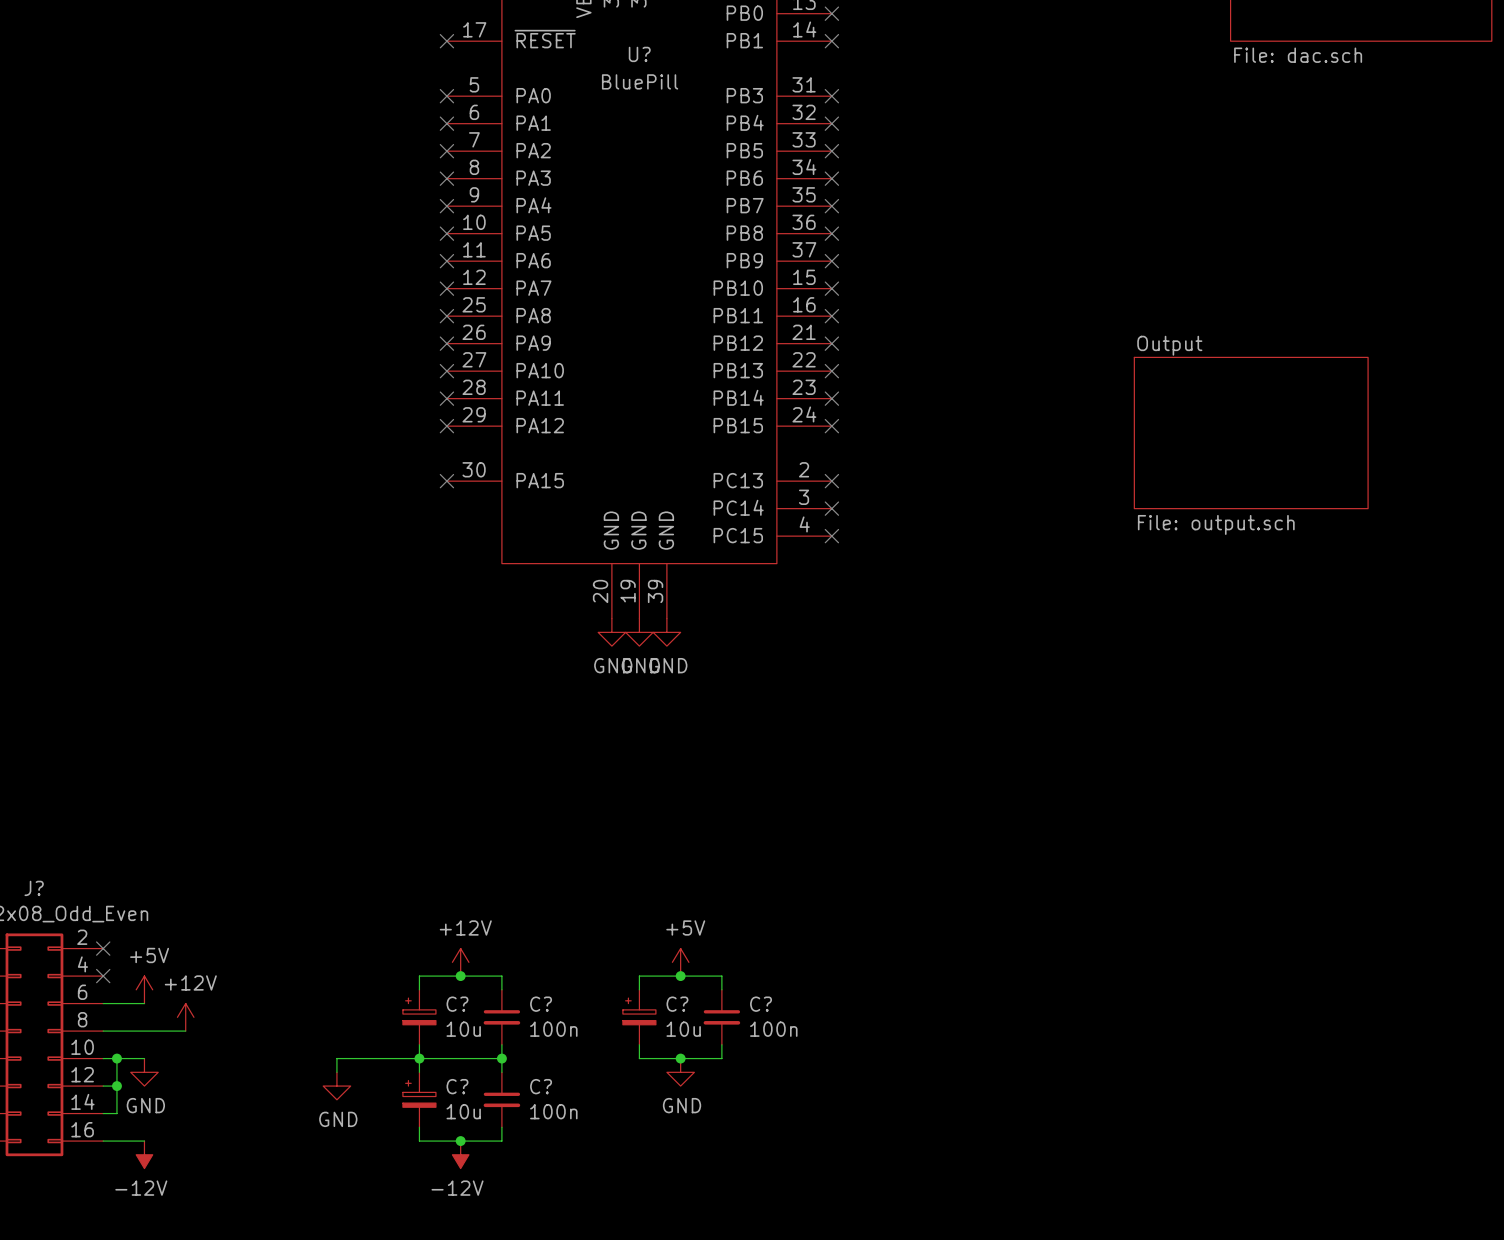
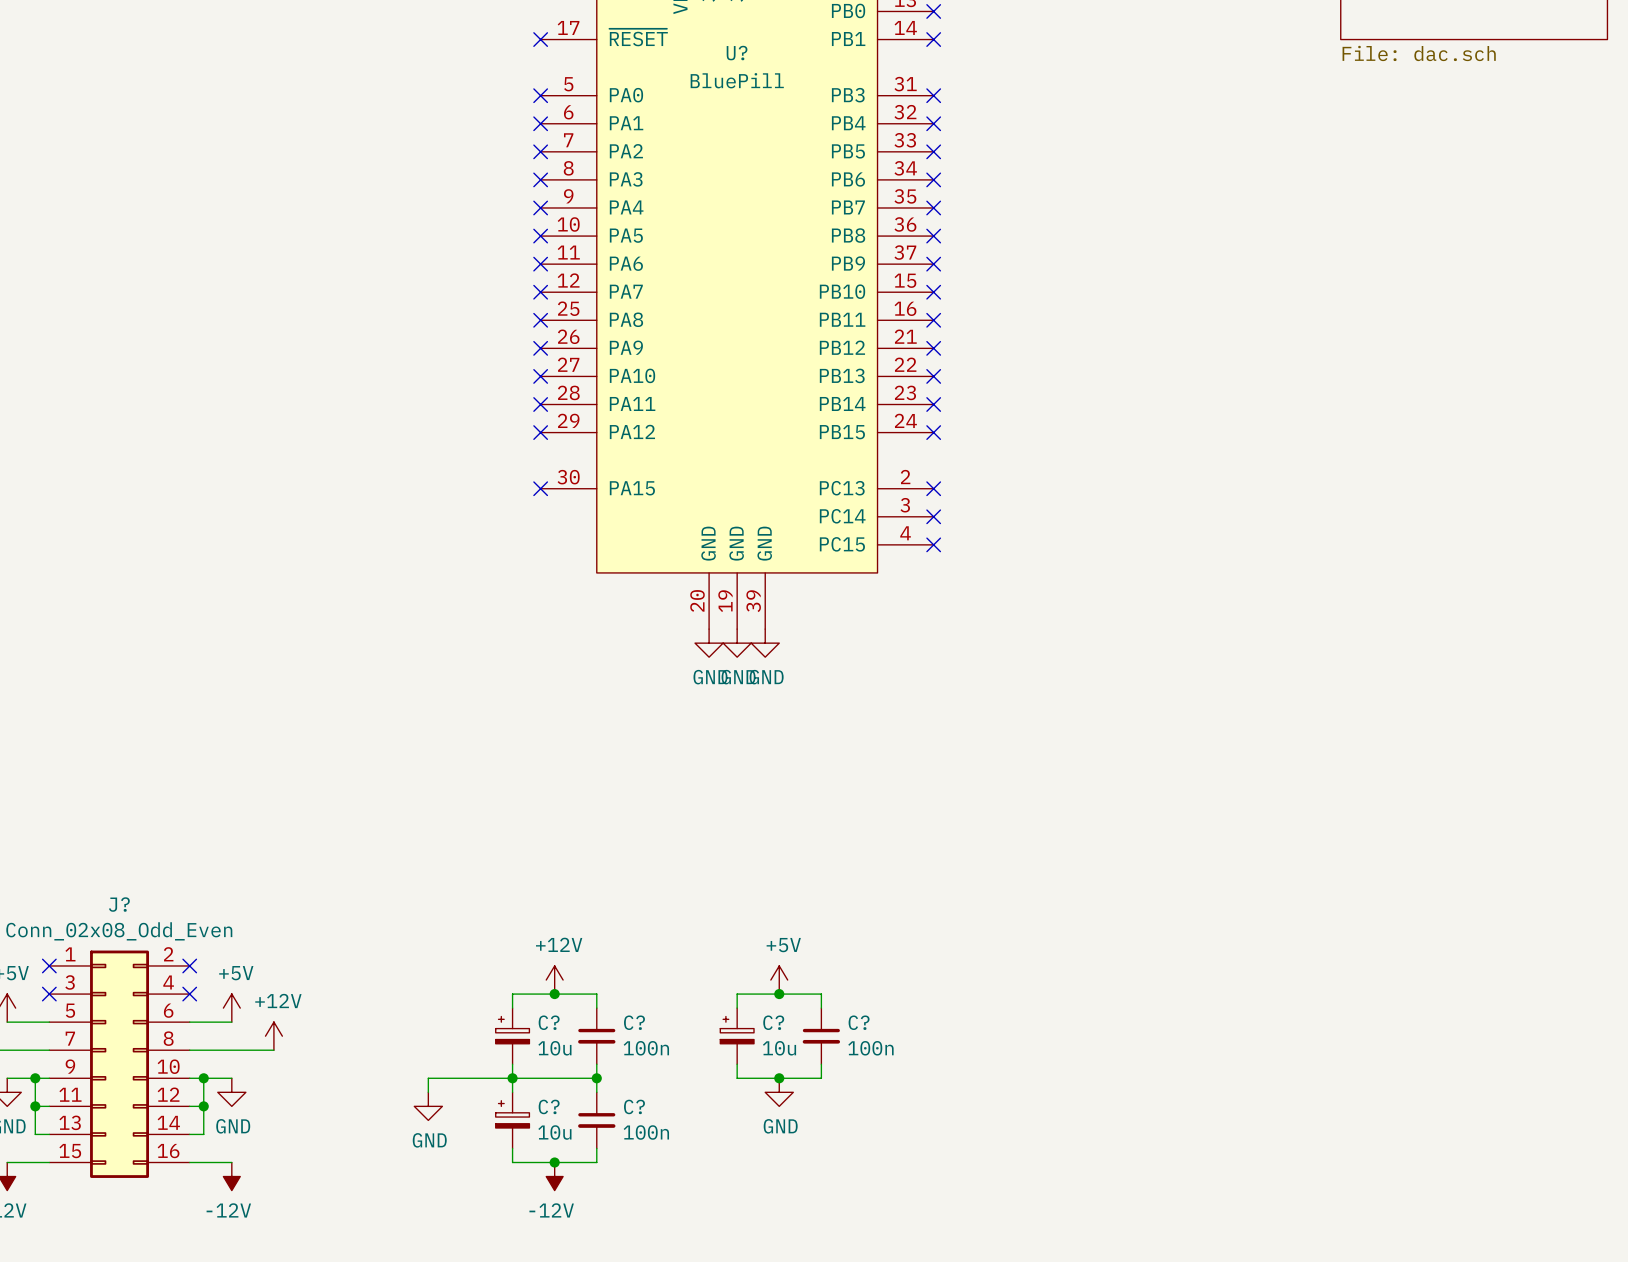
sheet Output: File: output.sch (1251, 433) -> none

